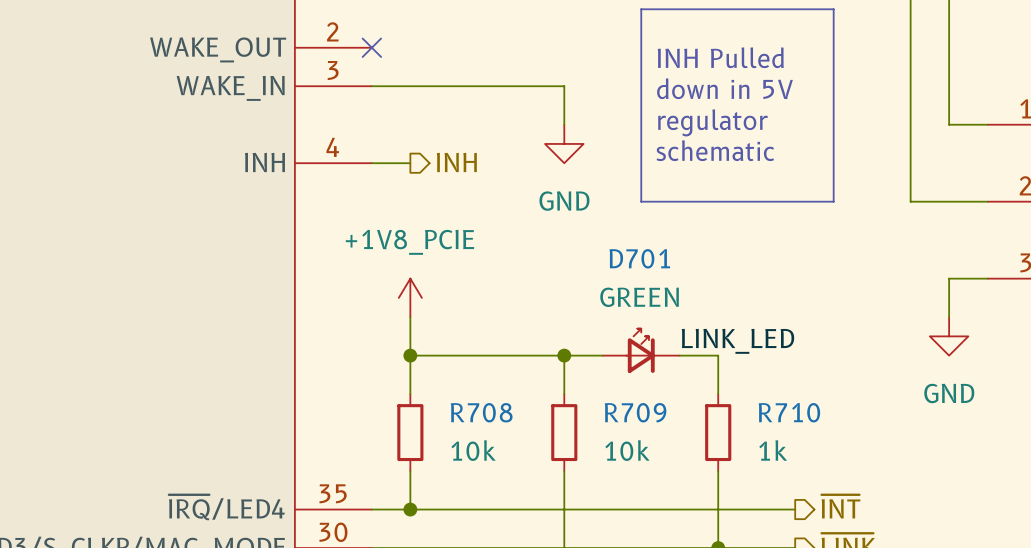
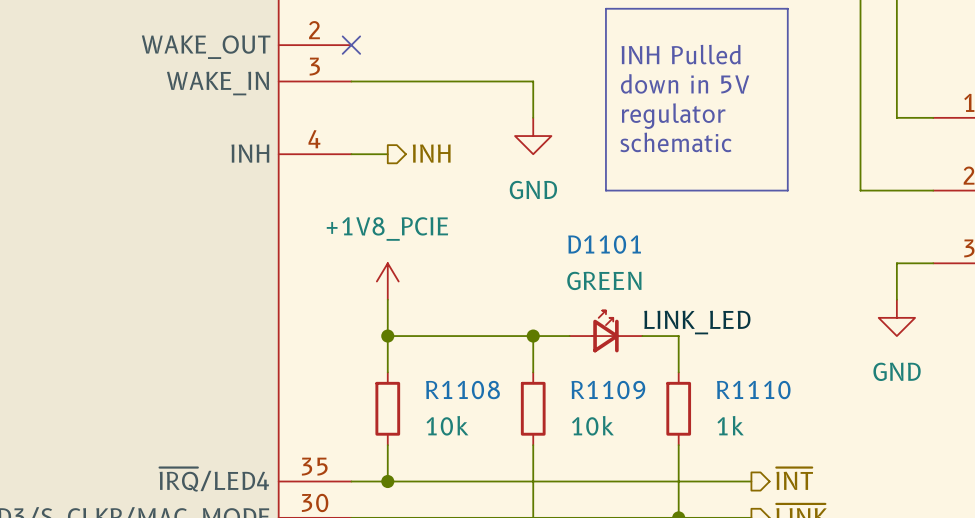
D701 name: D701 (639, 258) -> D1101 (604, 244)
R708 name: R708 (481, 412) -> R1108 (462, 390)
R709 name: R709 (635, 412) -> R1109 (608, 390)
R710 name: R710 (789, 412) -> R1110 (753, 390)

